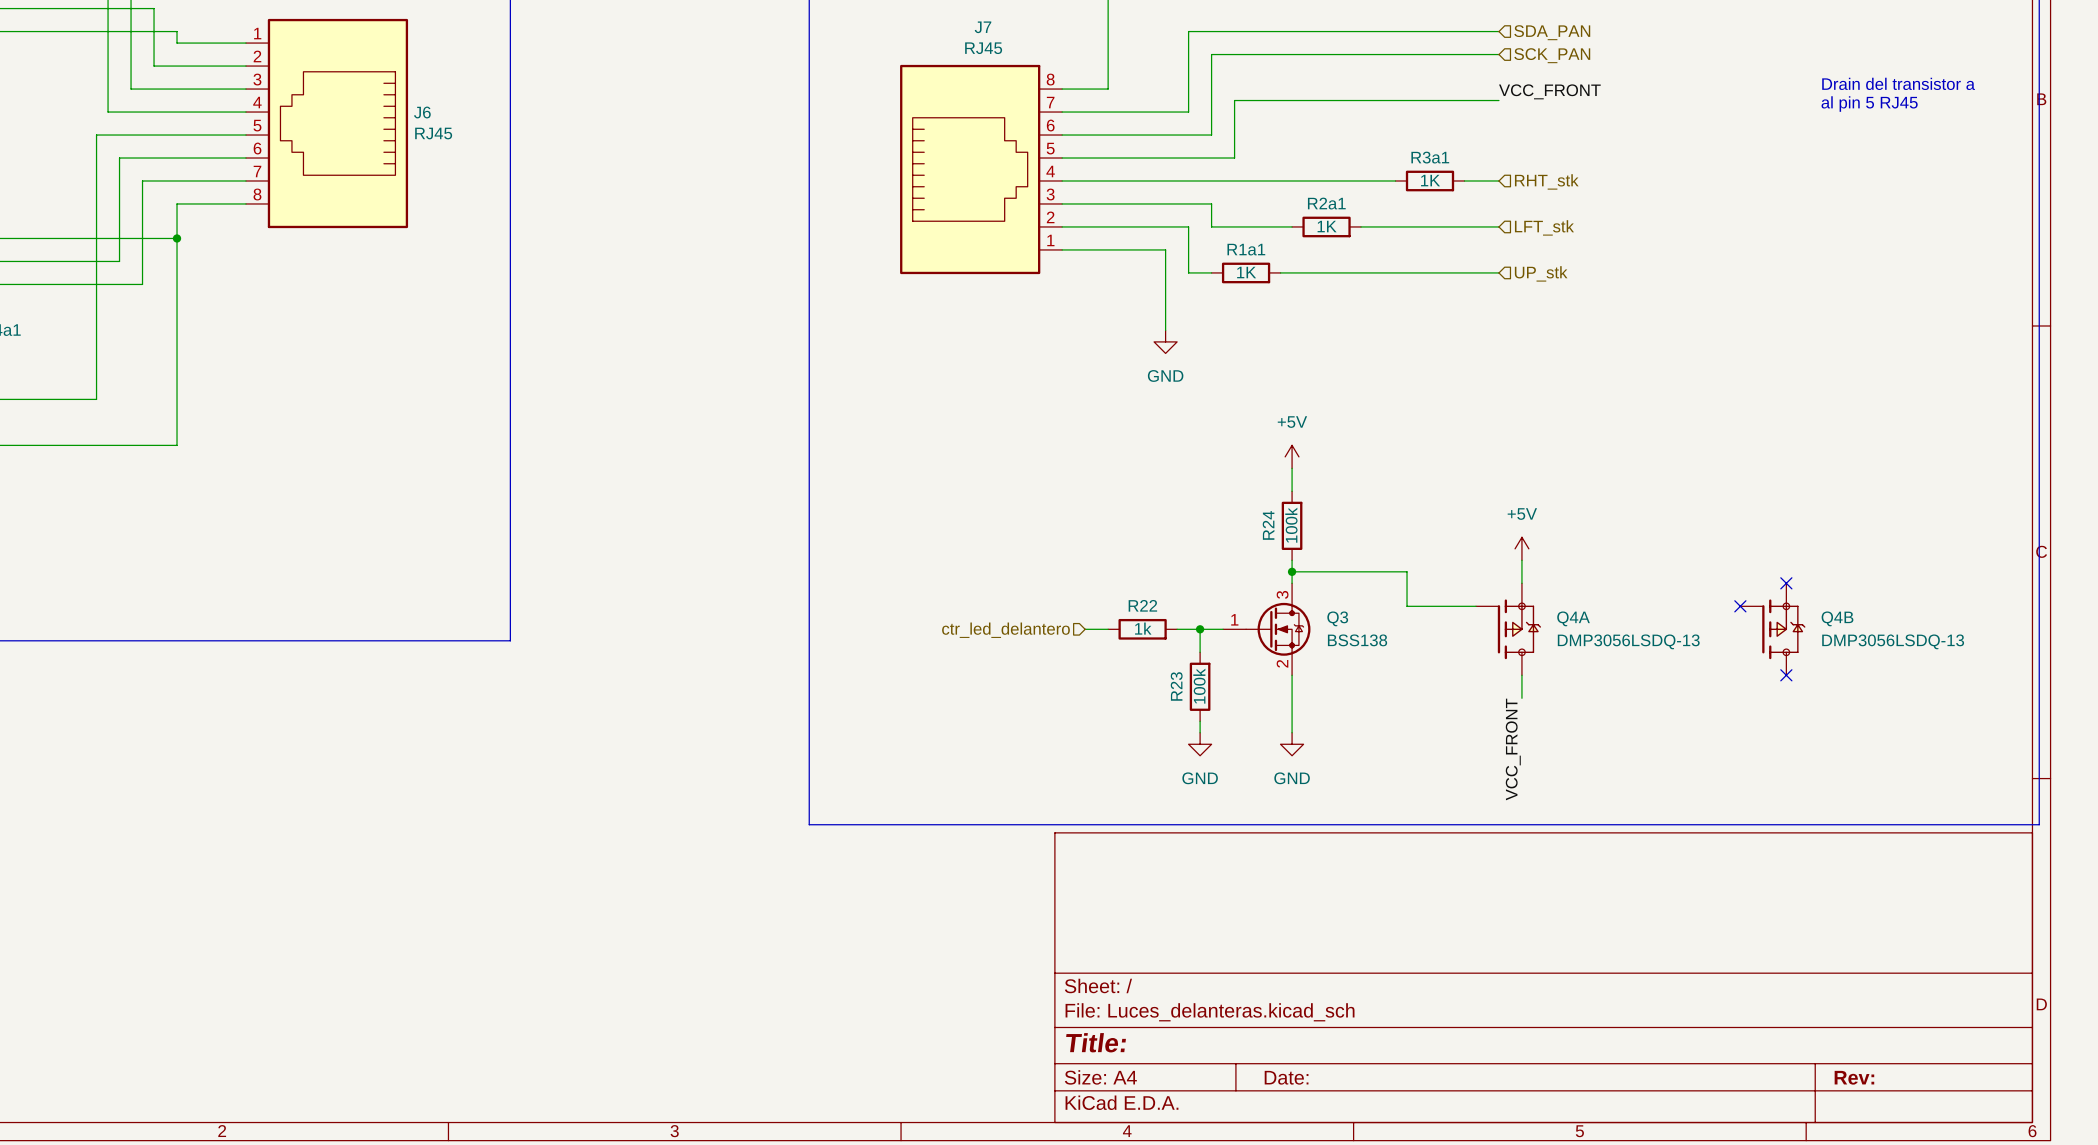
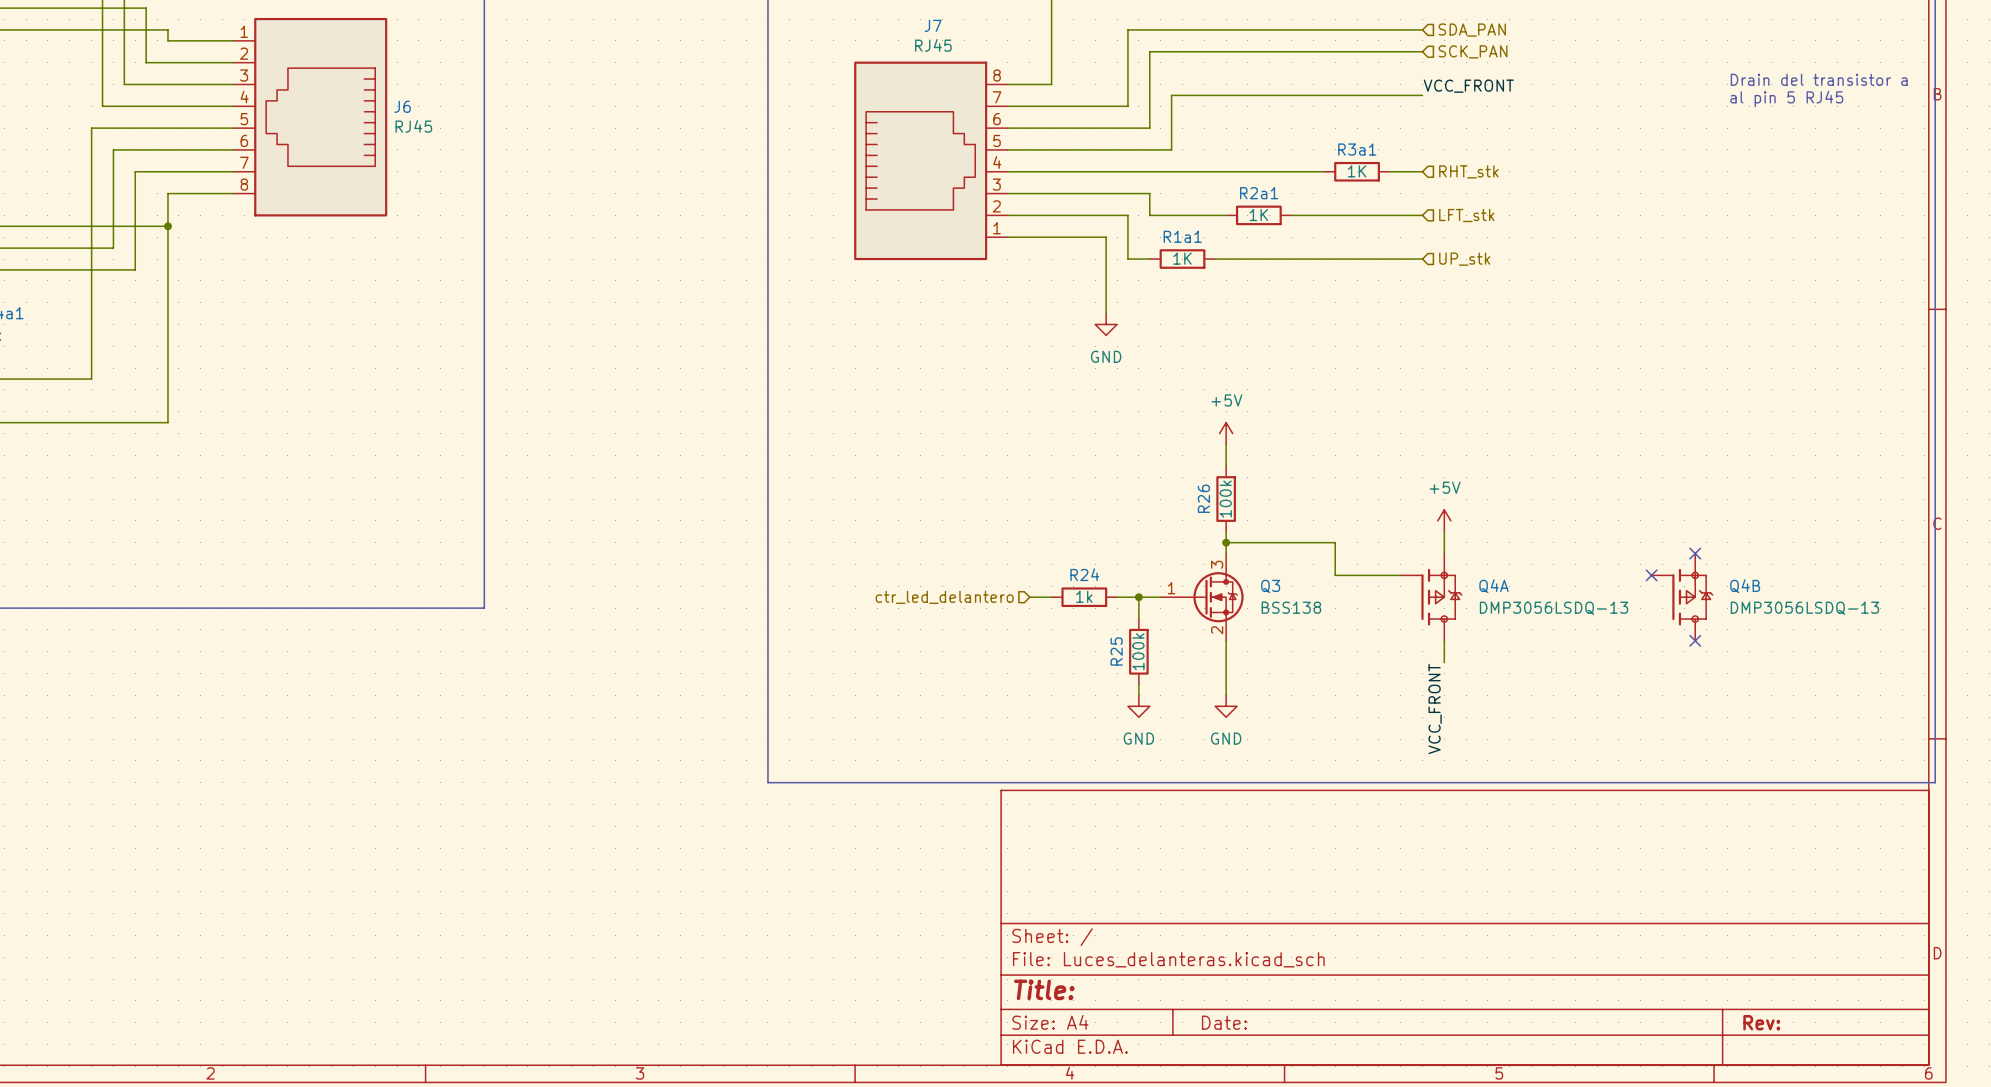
R24 name: R24 (1268, 525) -> R26 (1203, 498)
R22 name: R22 (1142, 605) -> R24 (1084, 574)
R23 name: R23 (1176, 686) -> R25 (1116, 651)

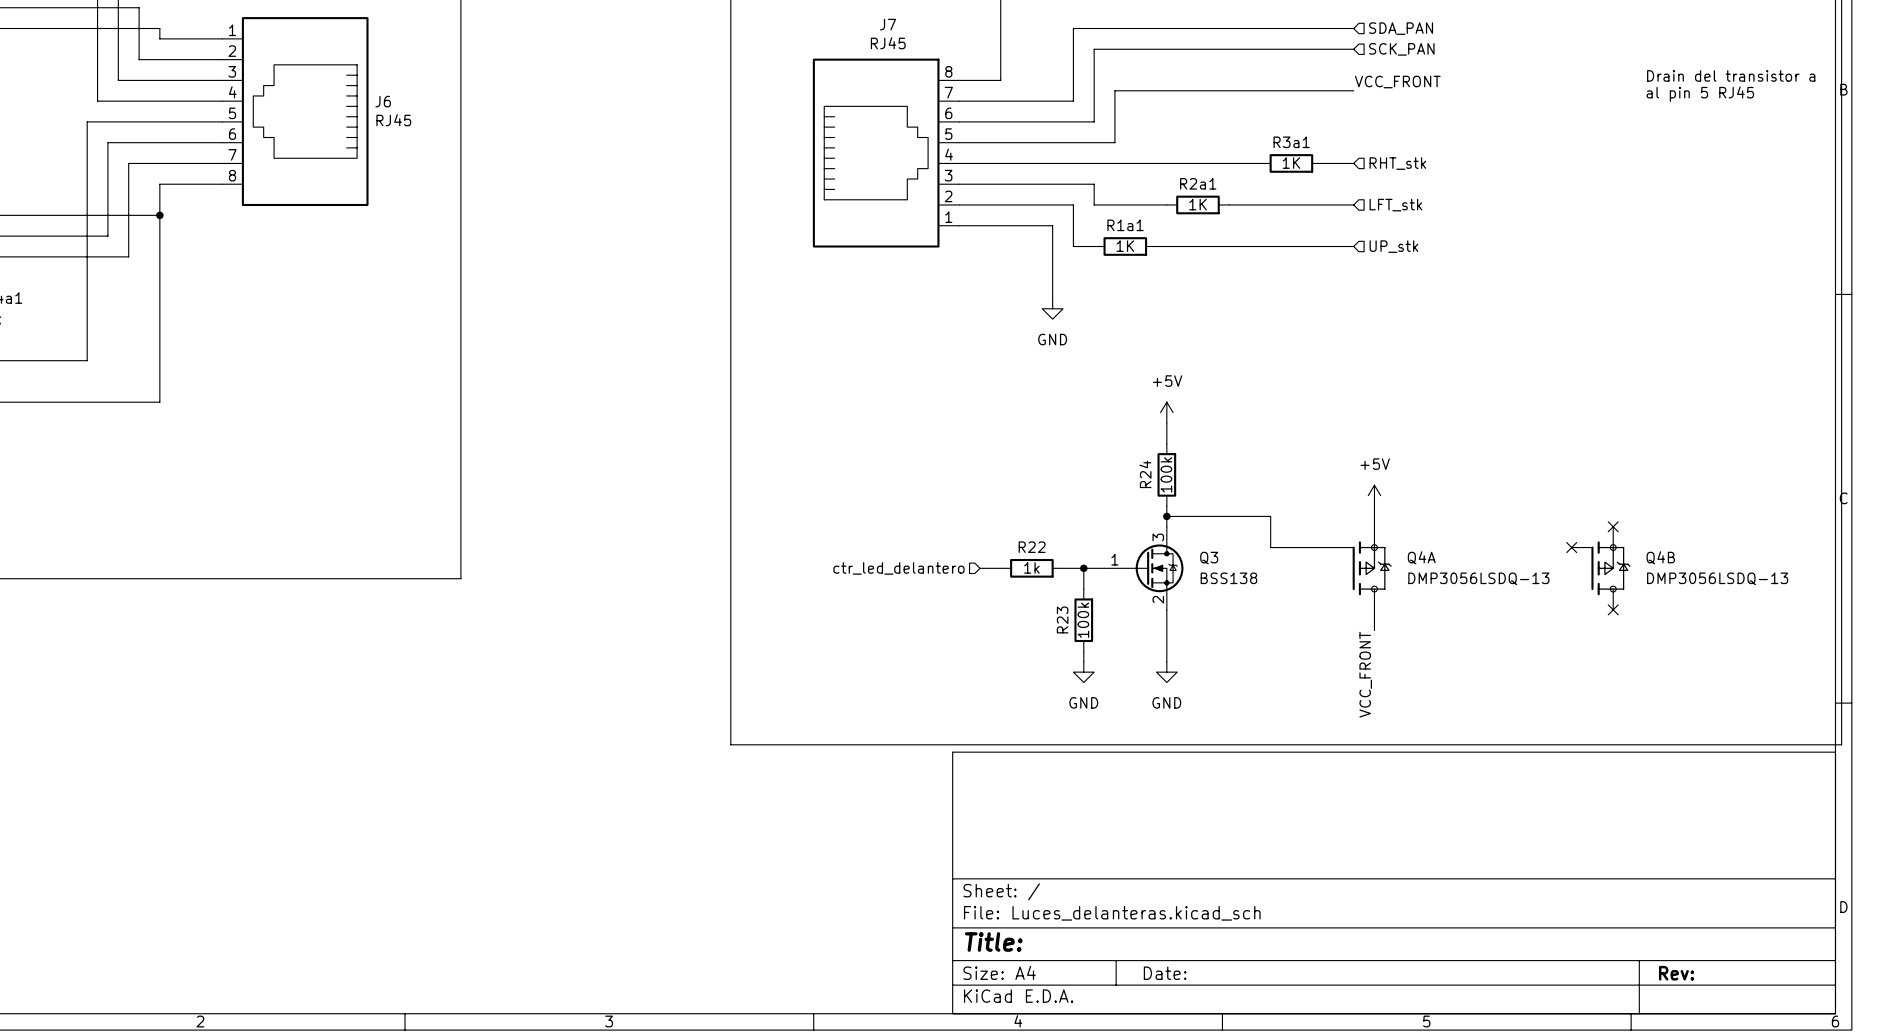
R26 name: R26 (1203, 498) -> R24 (1145, 474)
R24 name: R24 (1084, 574) -> R22 (1032, 547)
R25 name: R25 (1116, 651) -> R23 (1062, 619)

